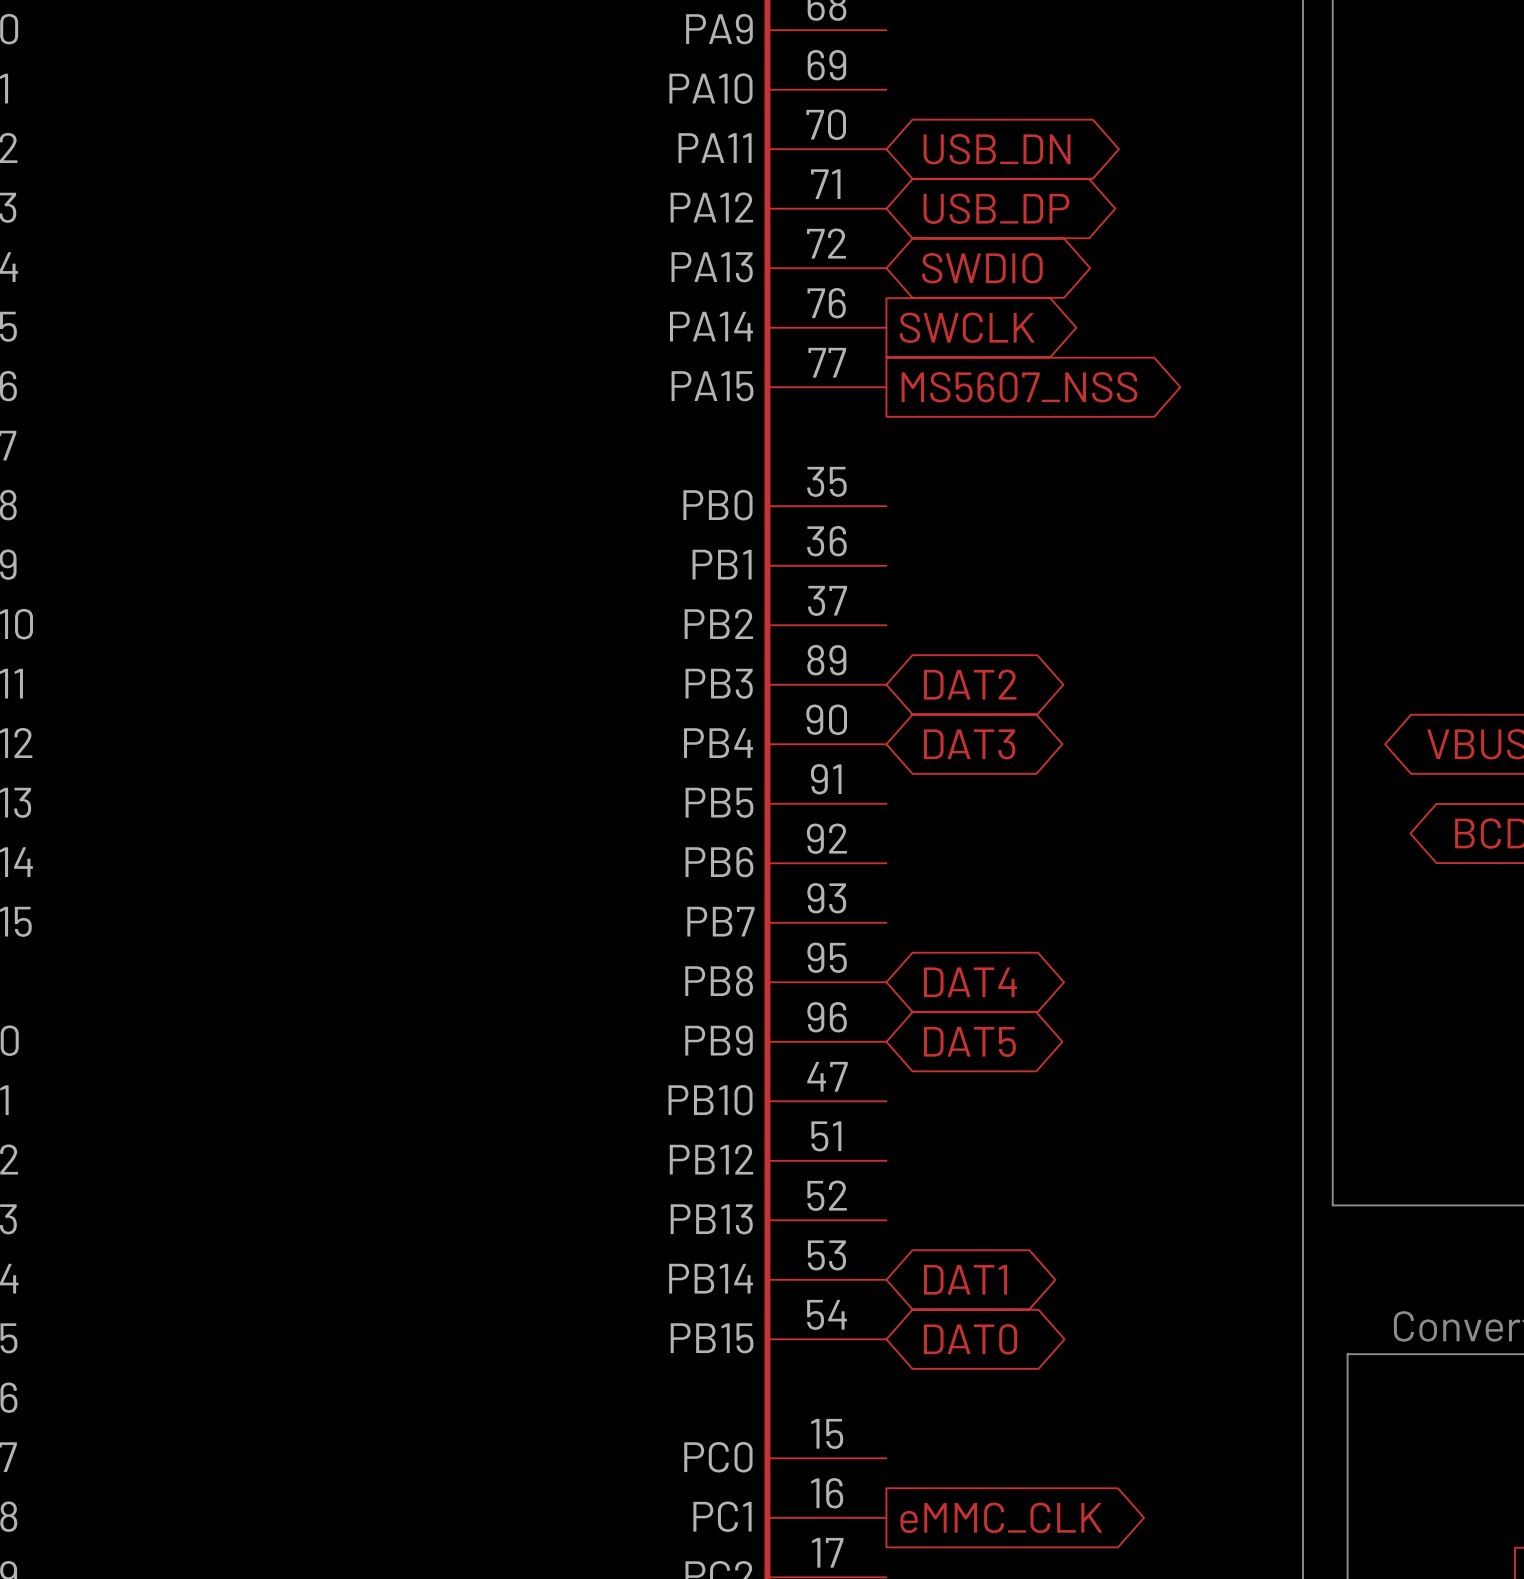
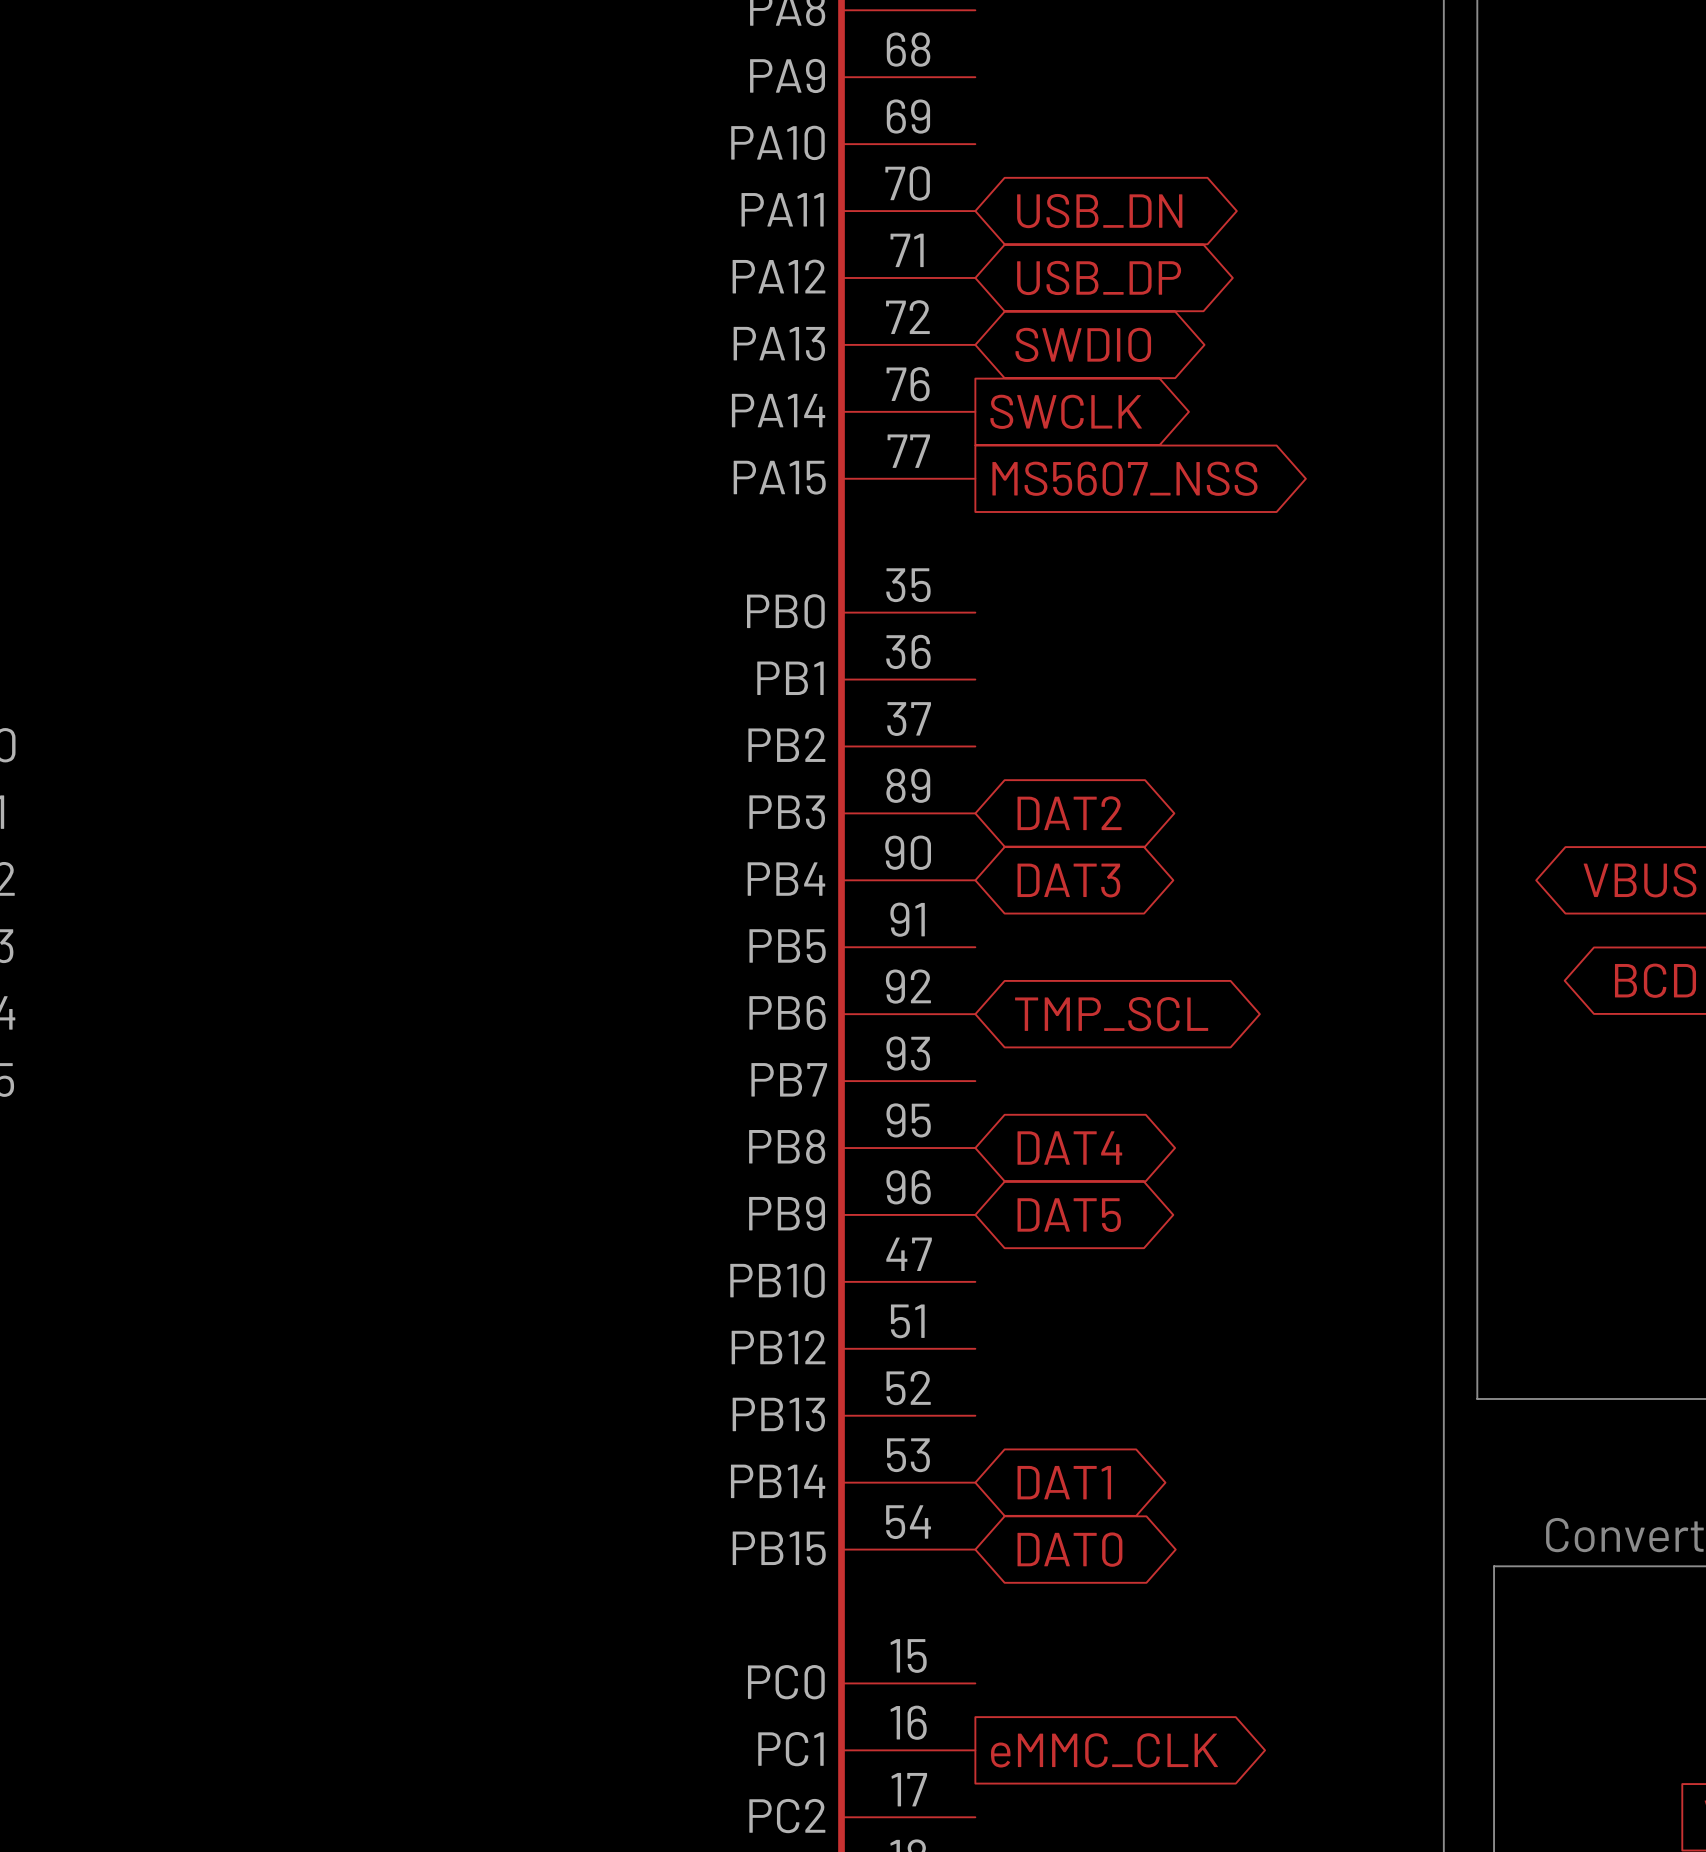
global label: none -> TMP_SCL (1111, 1014)

